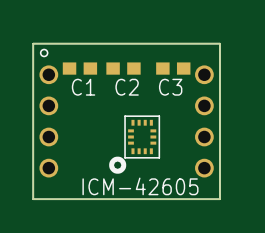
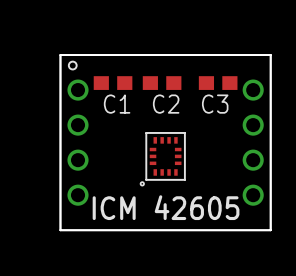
part: none -> (162, 159)
part: (134, 144) -> none
text: ICM-42605 (140, 186) -> ICM 42605 (166, 207)

